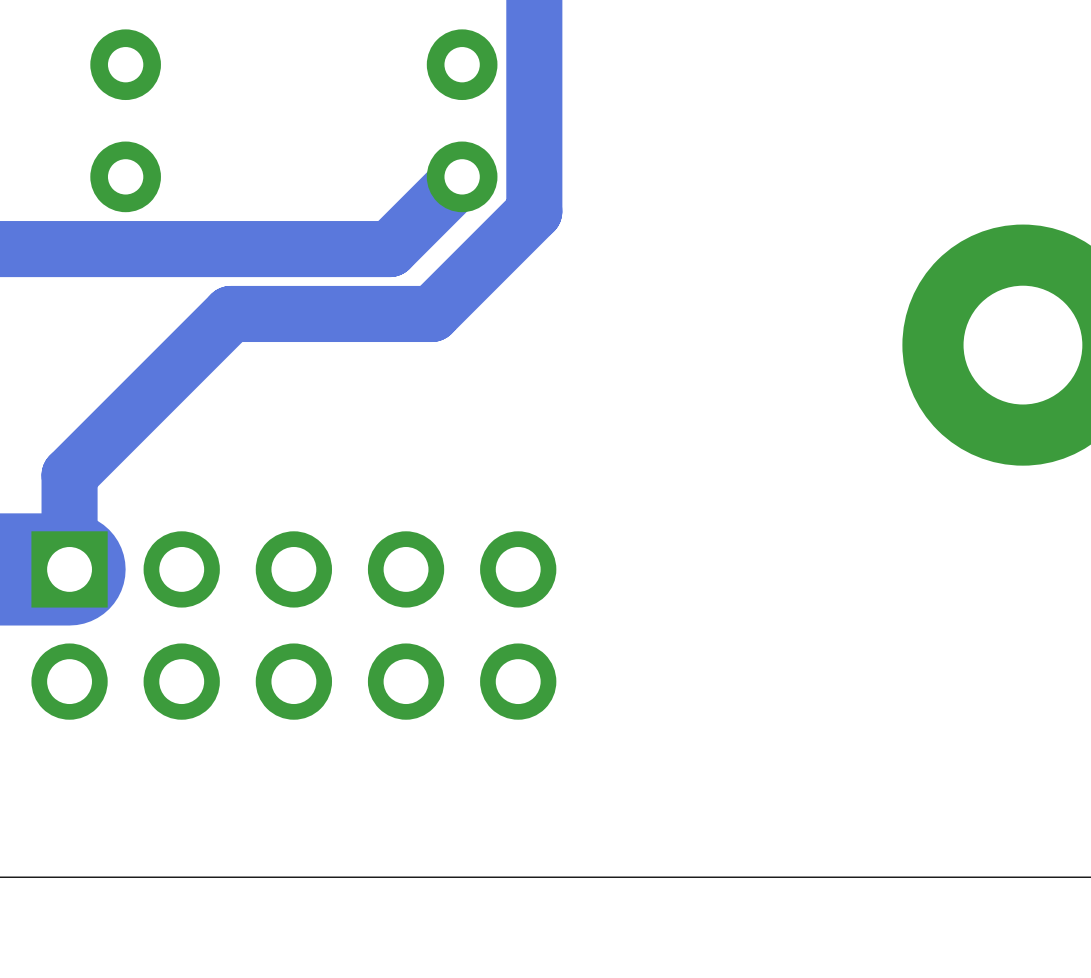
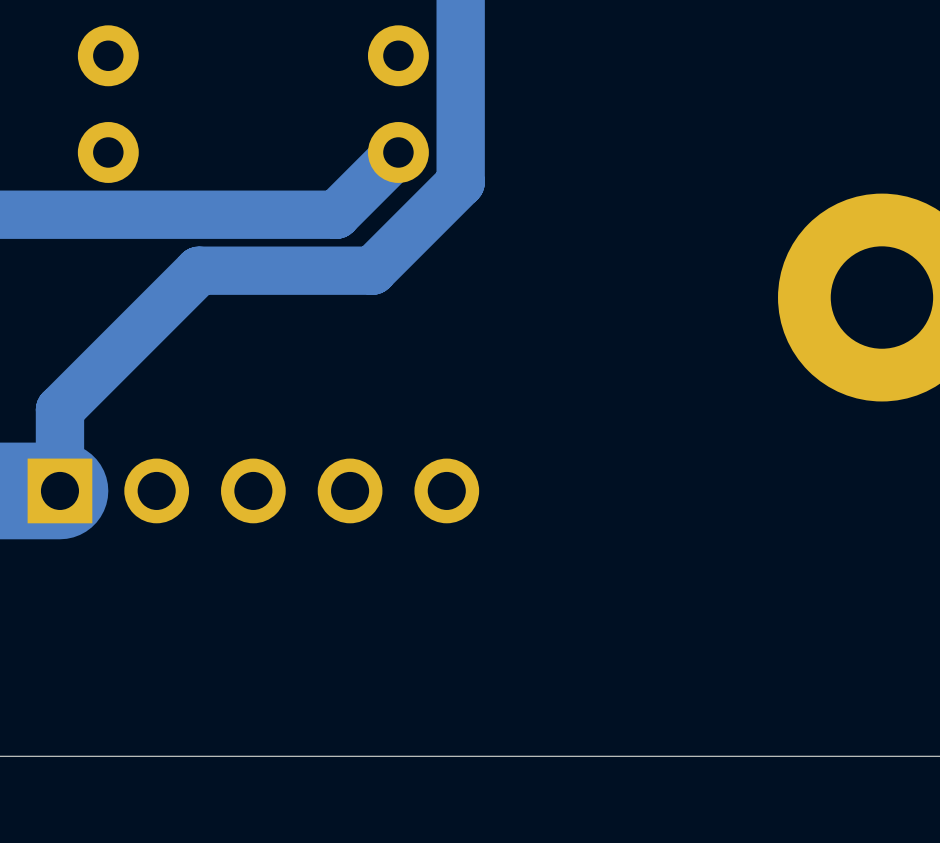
part: none -> (253, 490)
part: (293, 625) -> none

